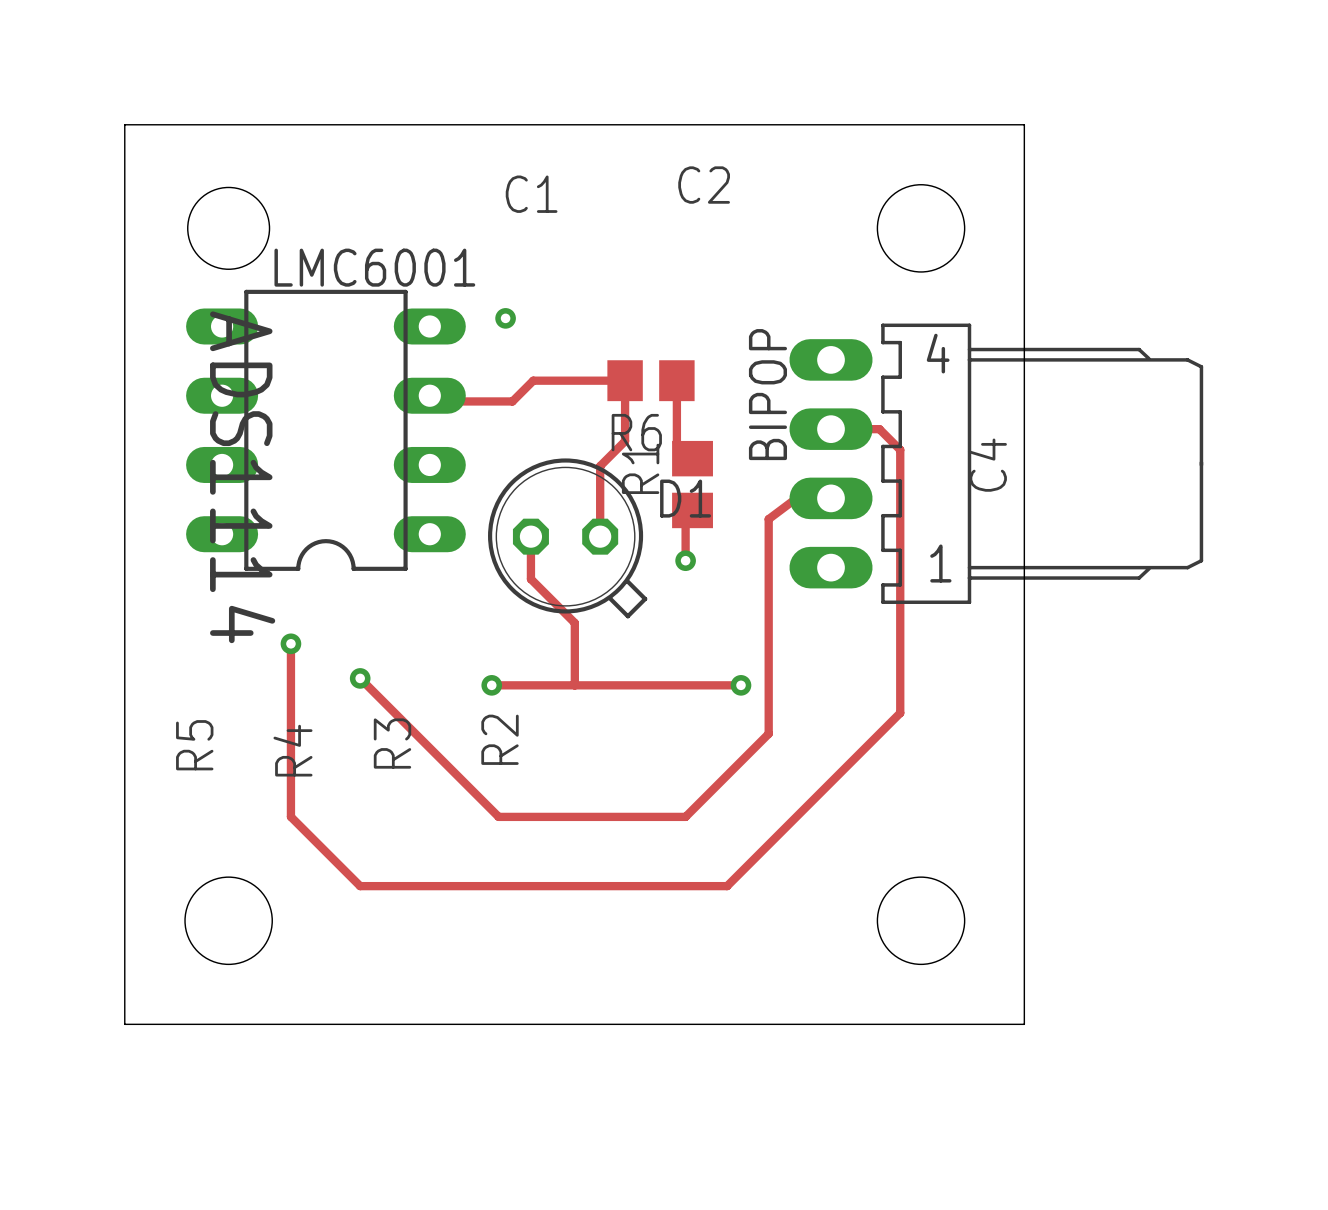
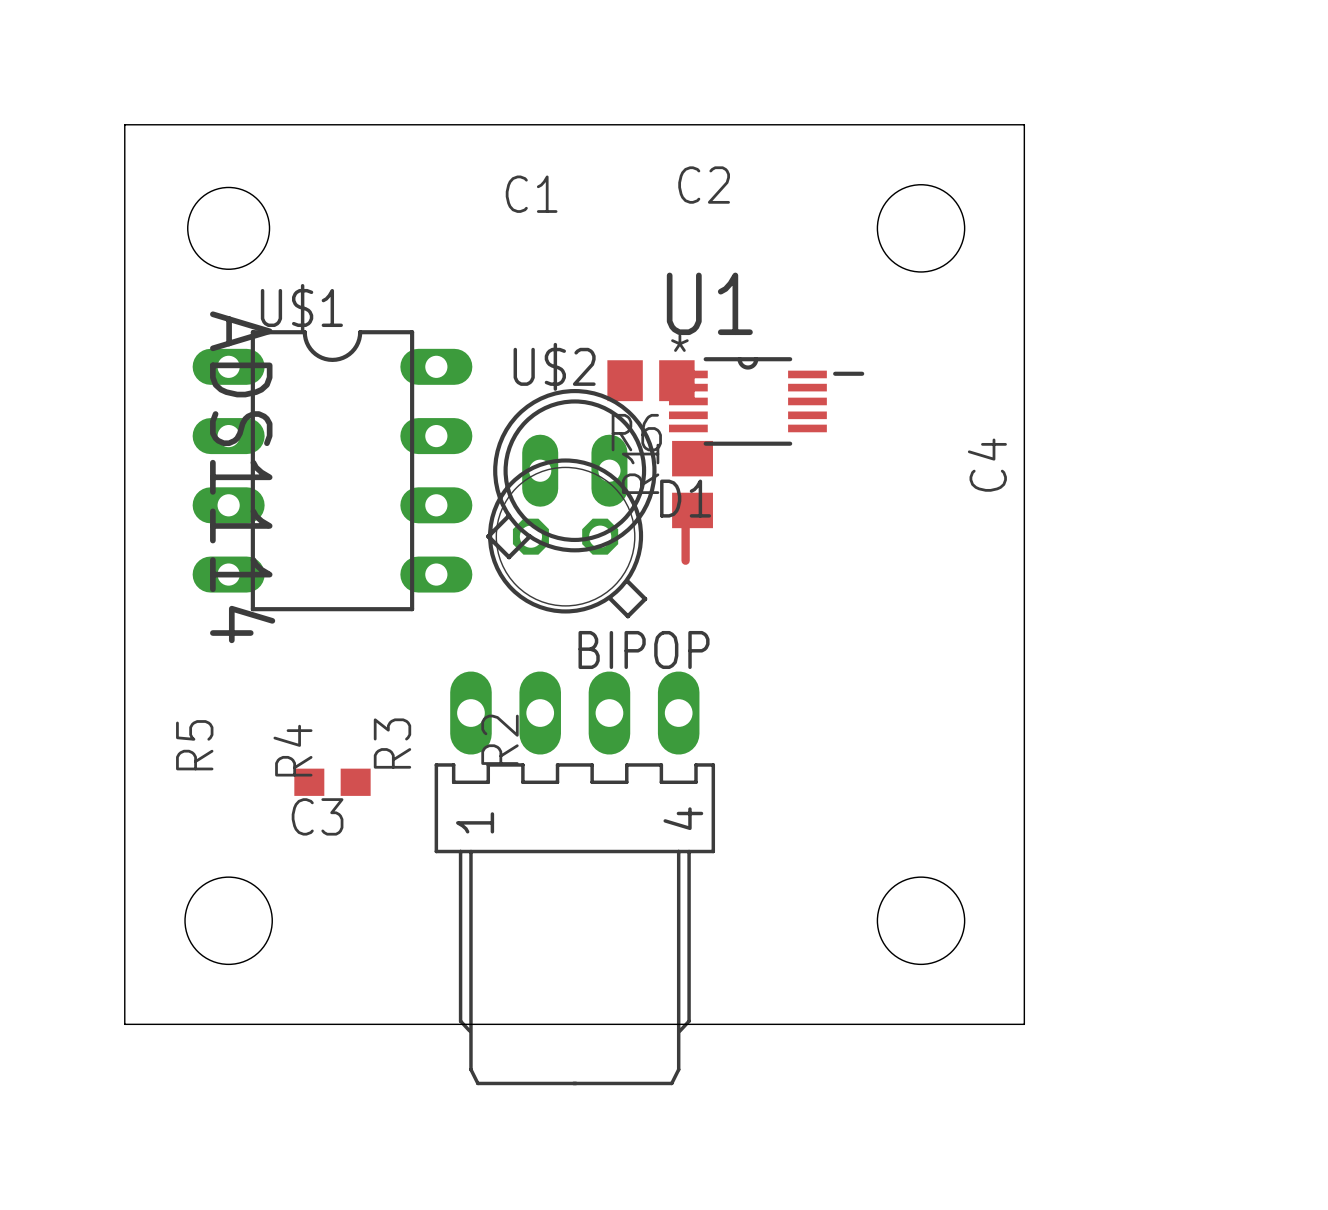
via: (505, 318) -> none
track: (676, 380) (676, 443) (692, 458) -> none
track: (429, 395) (435, 401) (512, 401) (533, 380) (625, 380) (625, 441) (600, 466) (600, 536) -> none
U1: none -> (766, 401)
track: (831, 429) (879, 429) (900, 449) (900, 713) (727, 886) (360, 886) (290, 816) (290, 643) -> none
LMC6001: (325, 430) -> none
BIPOP: (996, 463) -> none
U$1: none -> (332, 470)
U$2: none -> (571, 474)
track: (831, 498) (796, 498) (768, 519) (768, 733) (685, 816) (498, 816) (360, 678) -> none
track: (530, 536) (530, 579) (574, 623) (574, 685) -> none
via: (685, 560) -> none
via: (290, 643) -> none
via: (360, 678) -> none
track: (491, 685) (741, 685) -> none
via: (491, 685) -> none
via: (741, 685) -> none
C3: none -> (332, 782)
BIPOP: none -> (574, 878)

